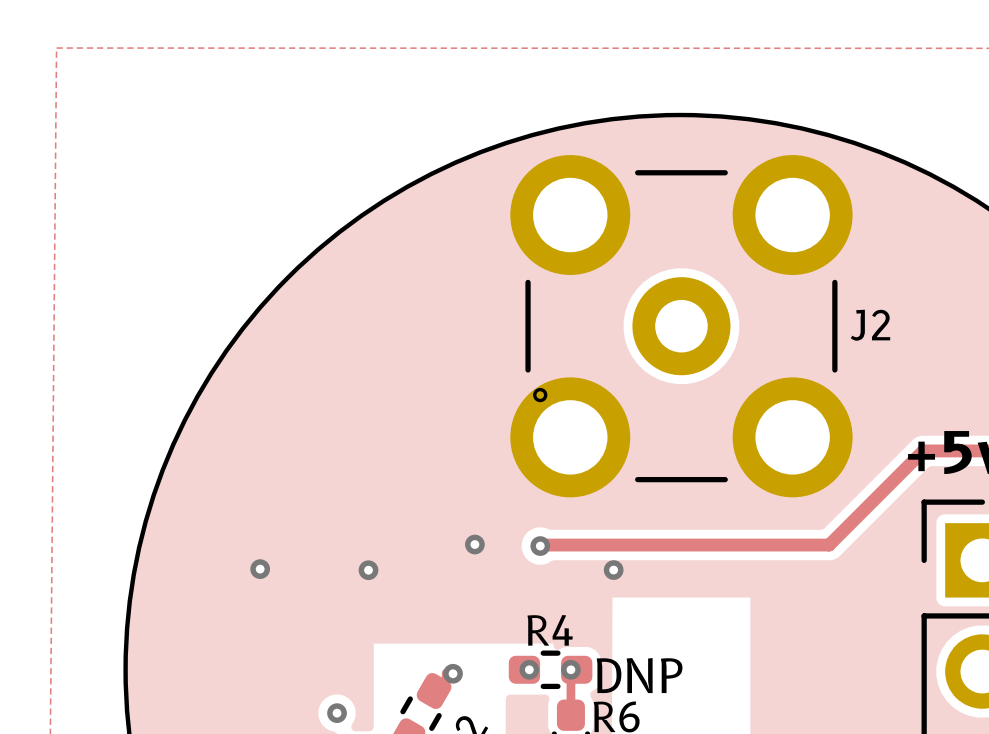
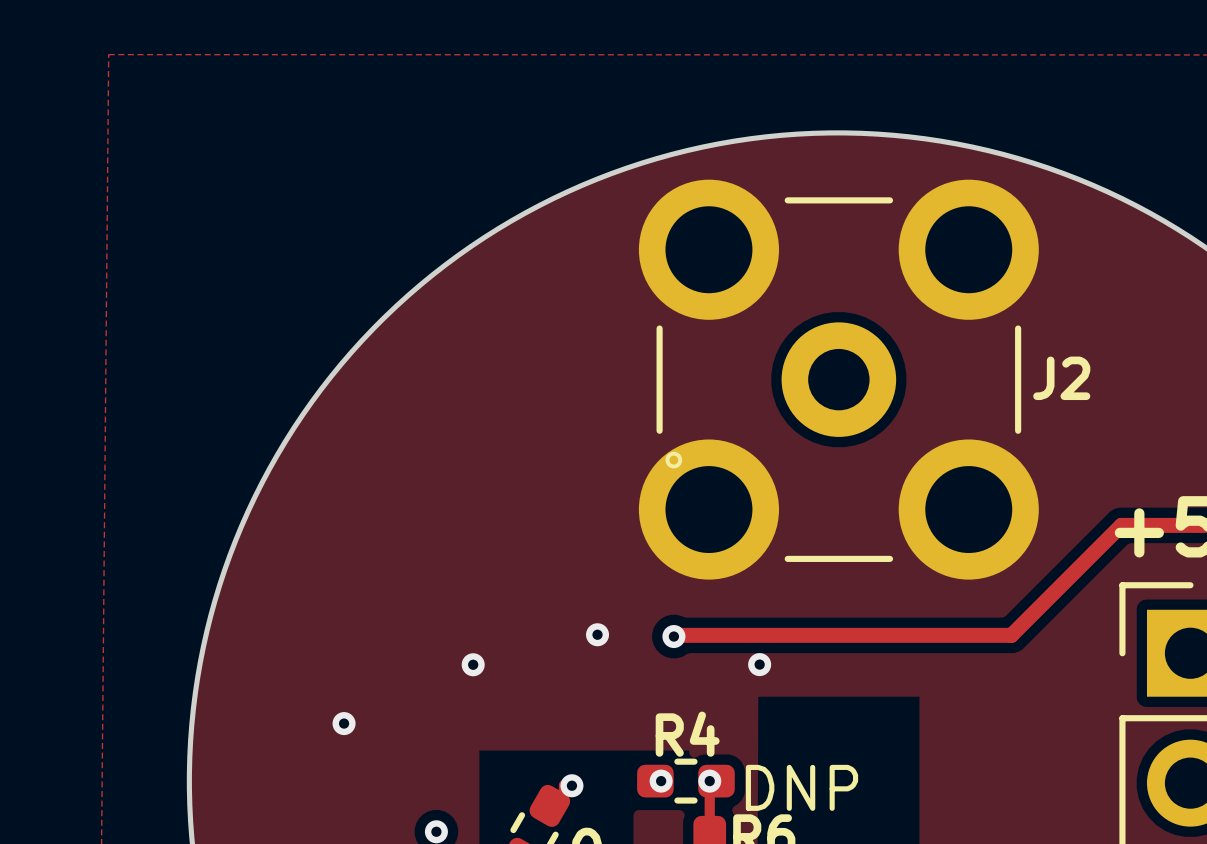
via position: (260, 569) -> (344, 723)

